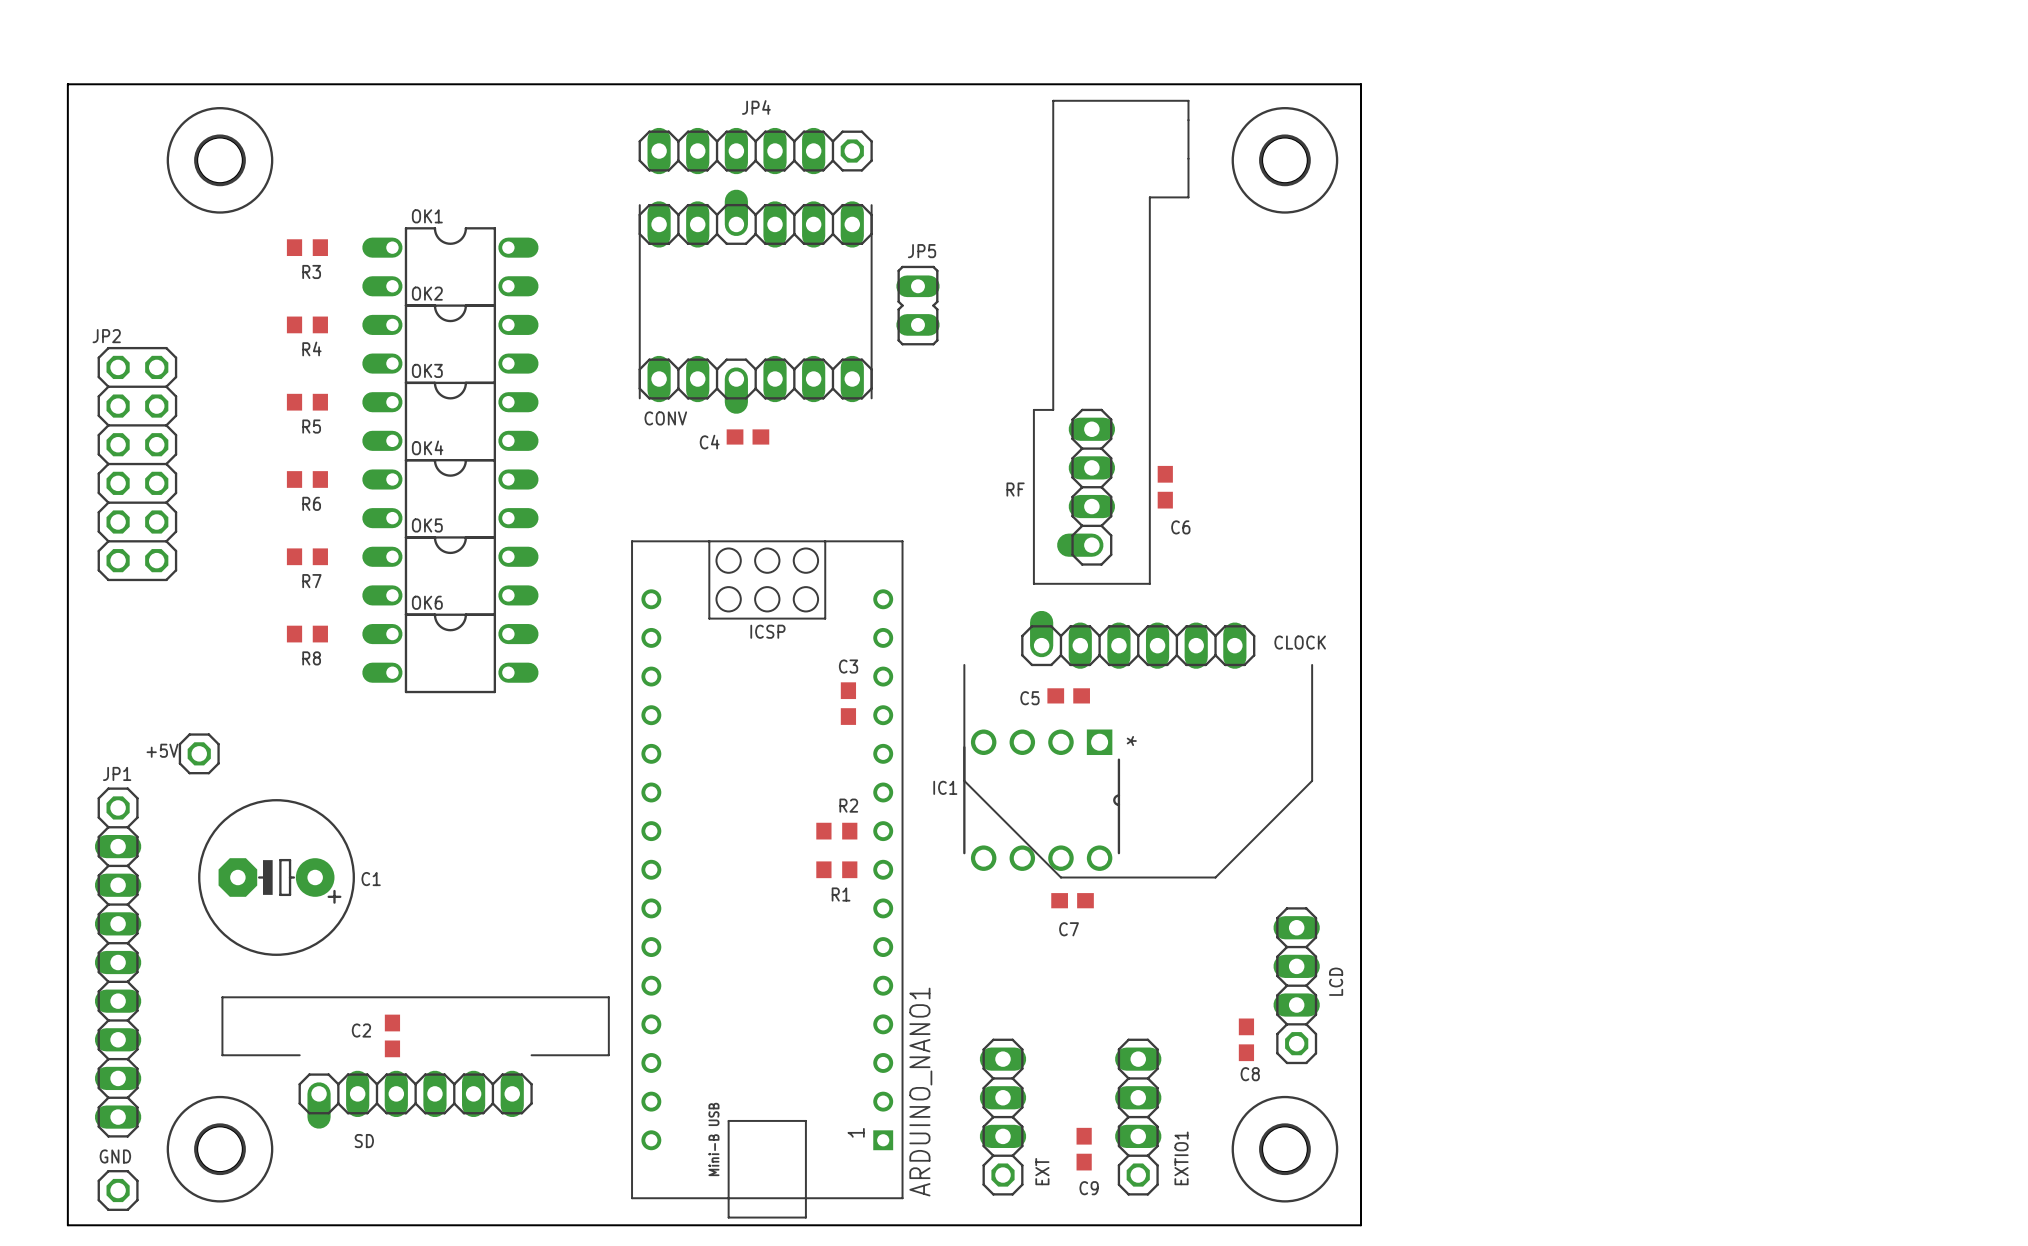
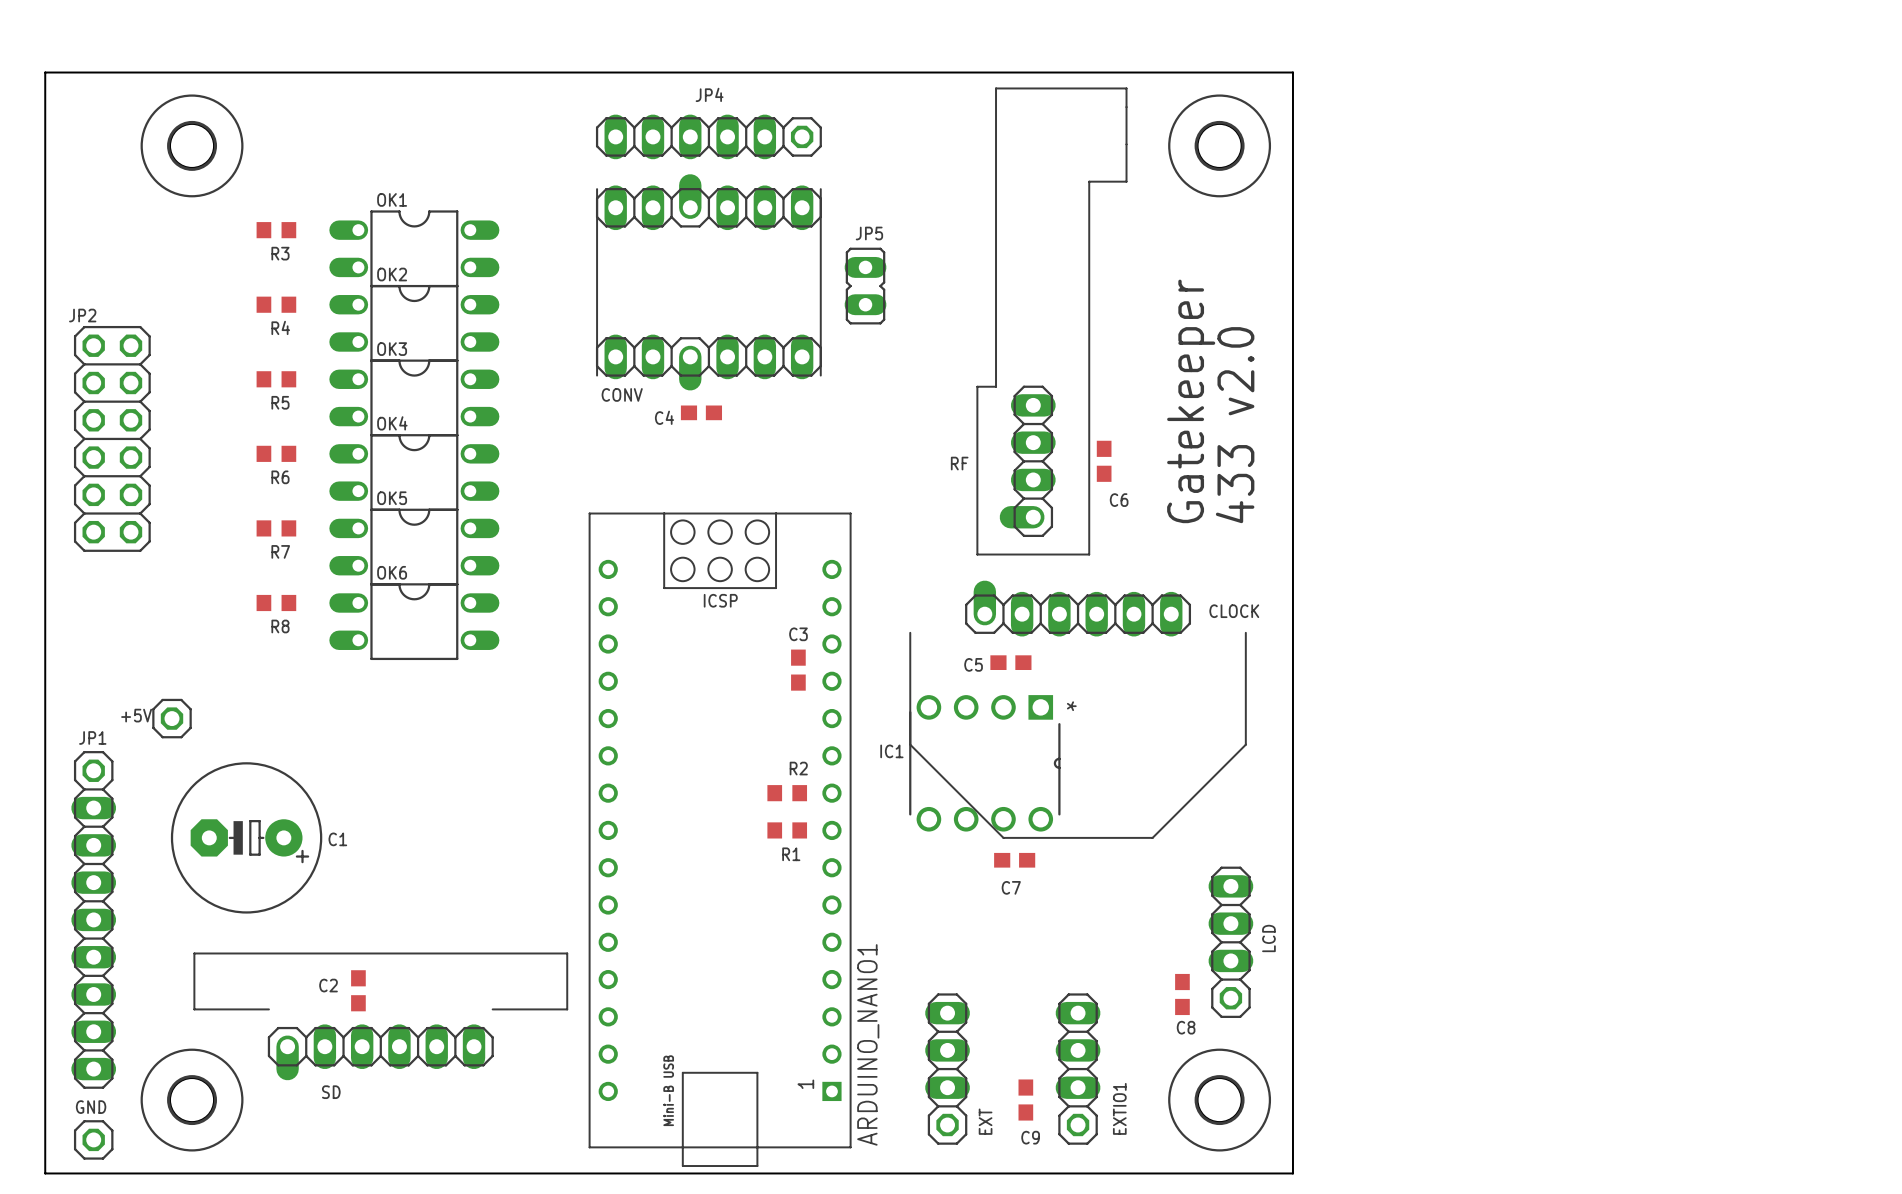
text: none -> Gatekeeper (1191, 401)
text: none -> 433 v2.0 (1235, 425)

